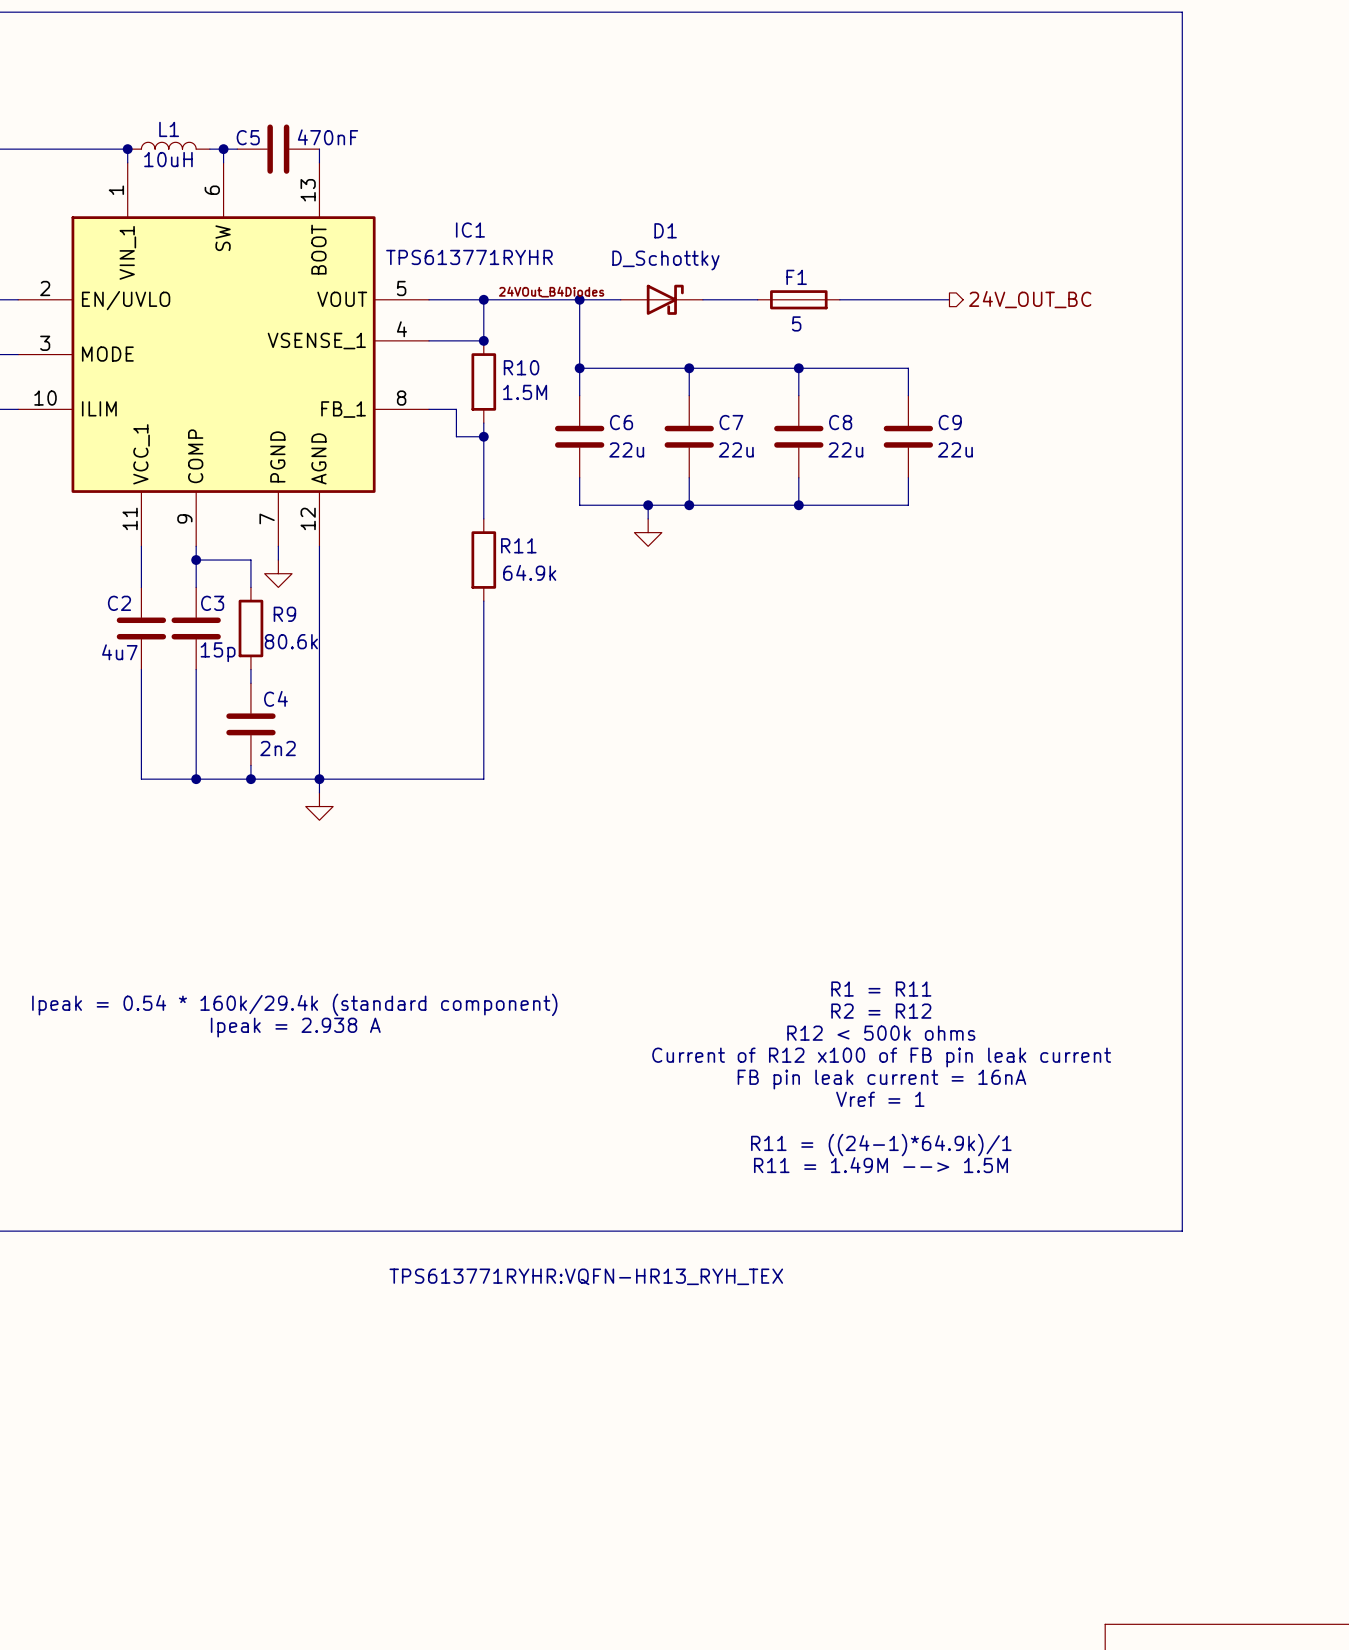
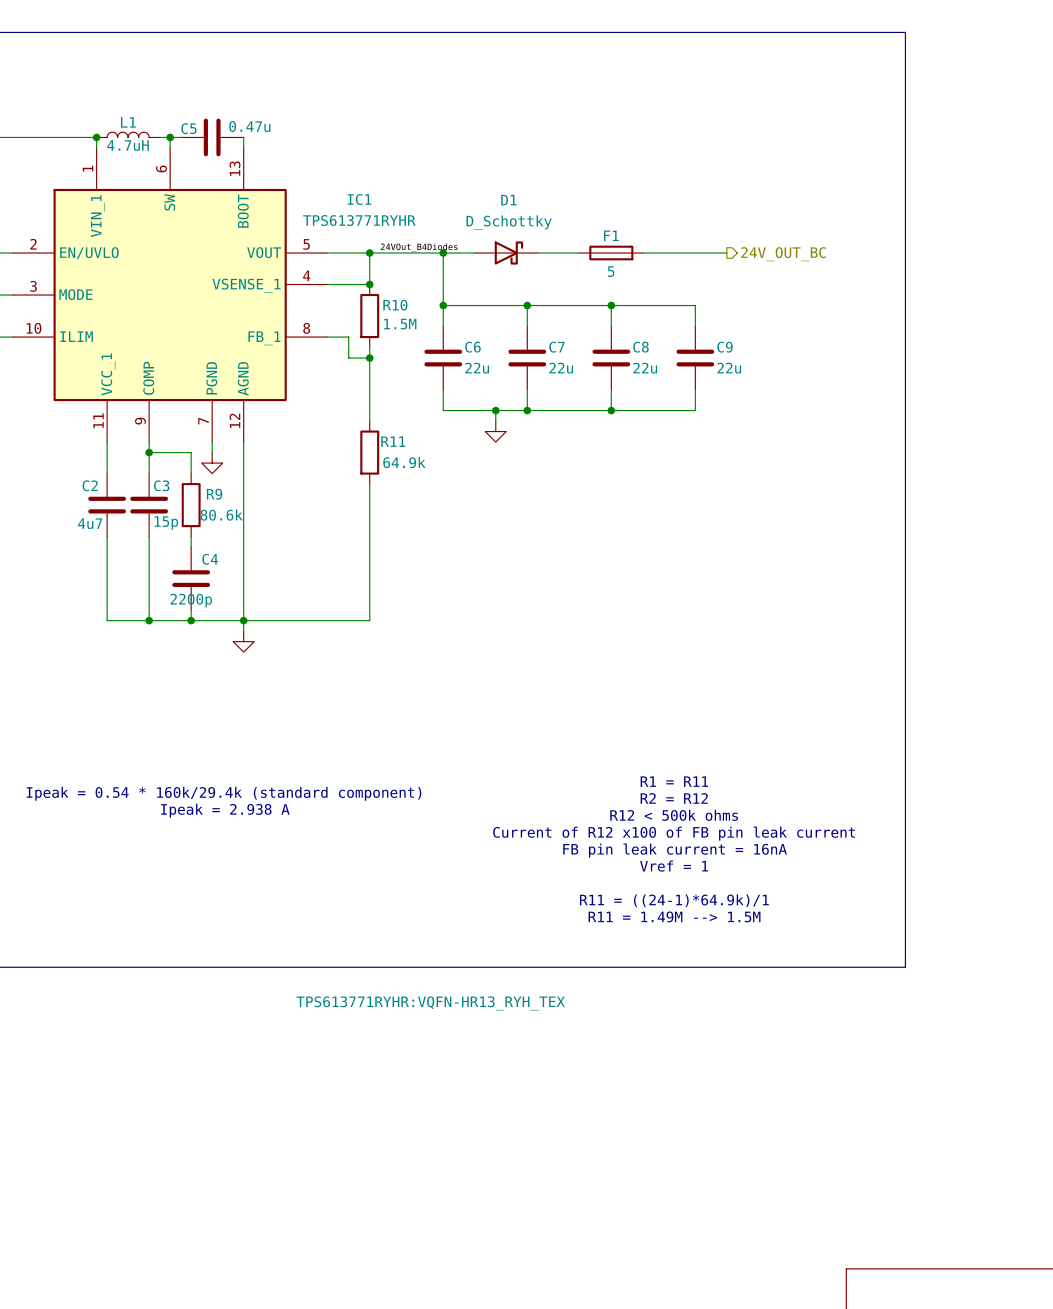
C5 value: 470nF (327, 137) -> 0.47u (249, 126)
L1 value: 10uH (168, 159) -> 4.7uH (128, 145)
C4 value: 2n2 (278, 748) -> 2200p (191, 600)

